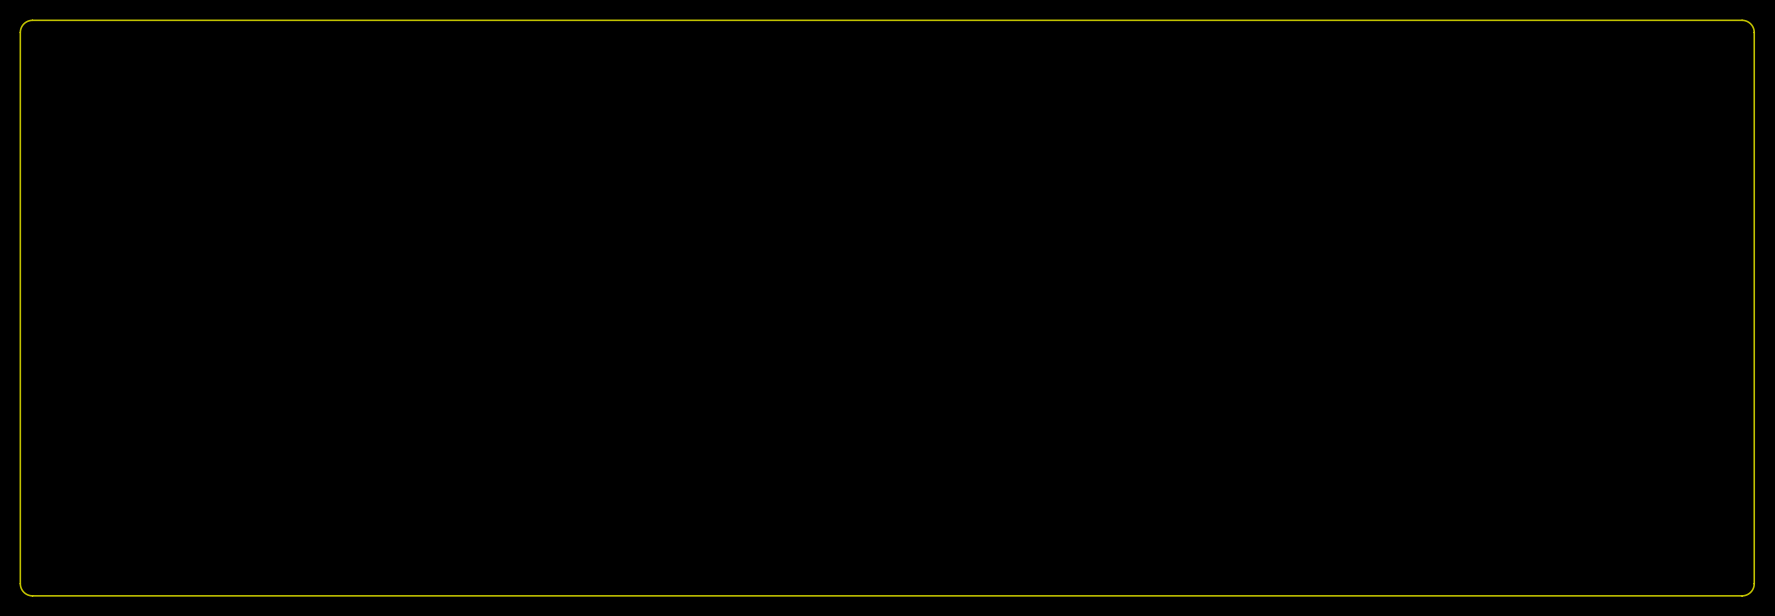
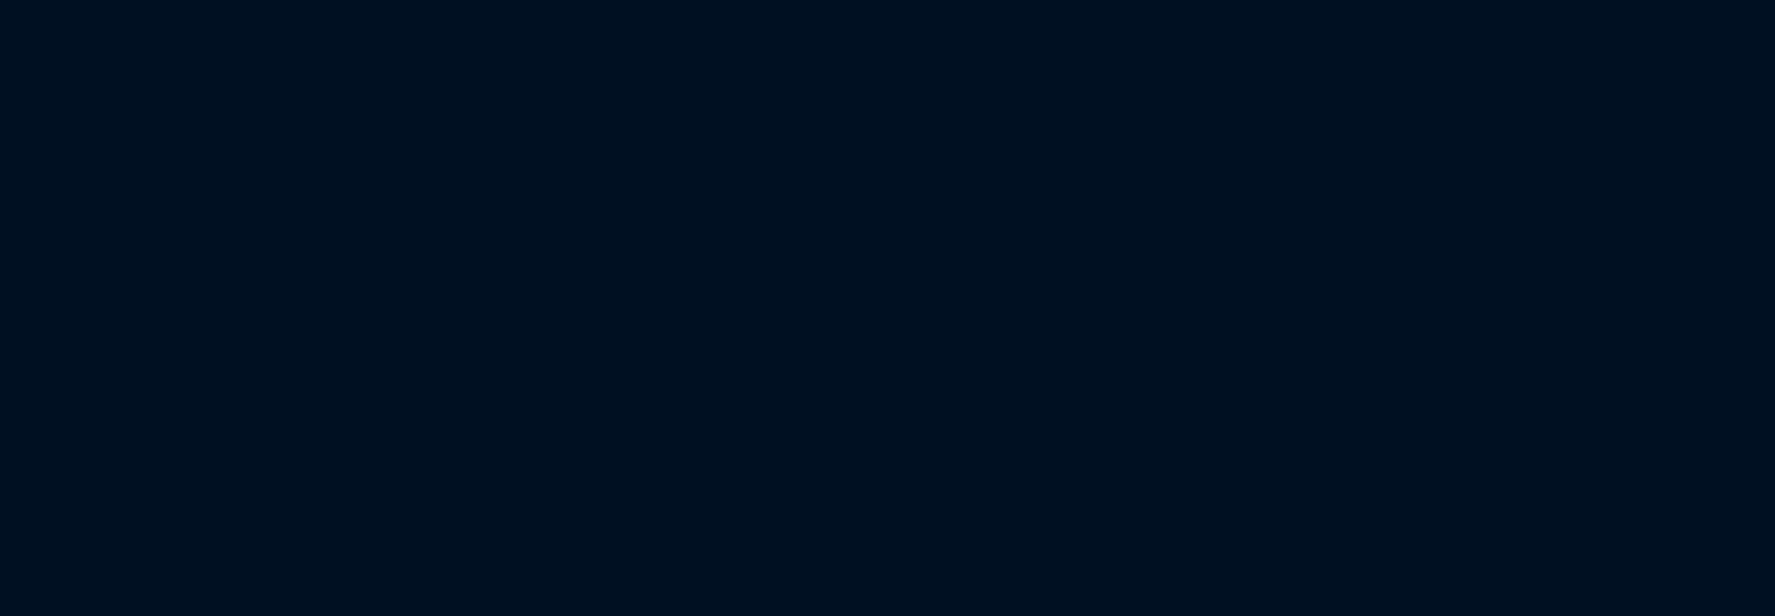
board edge: (32, 20) (1745, 20) (1751, 25) (1754, 32) (1753, 586) (1749, 593) (1742, 595) (29, 595) (22, 591) (20, 583) (20, 32) (23, 23) (32, 20) -> none

